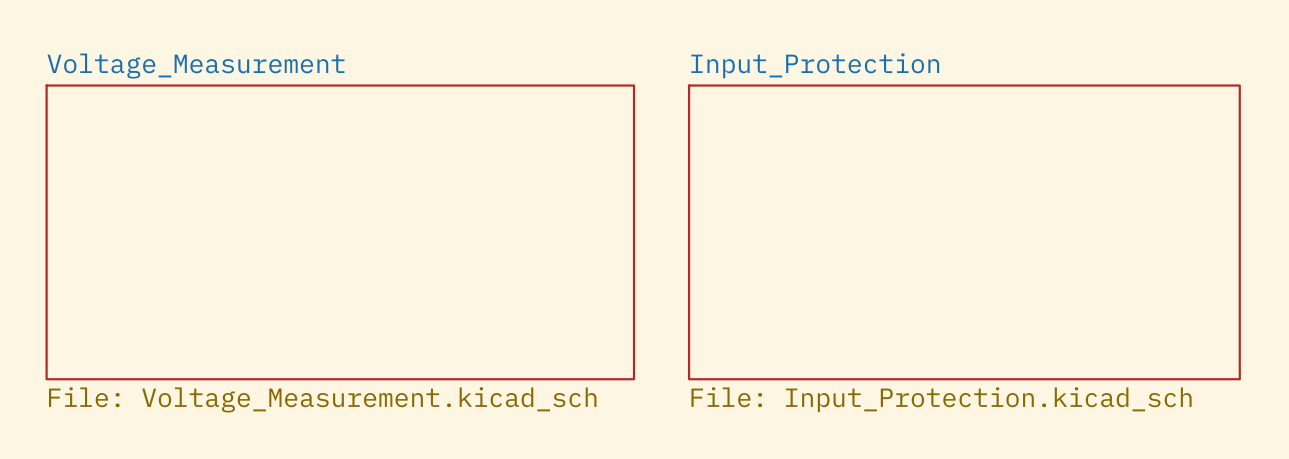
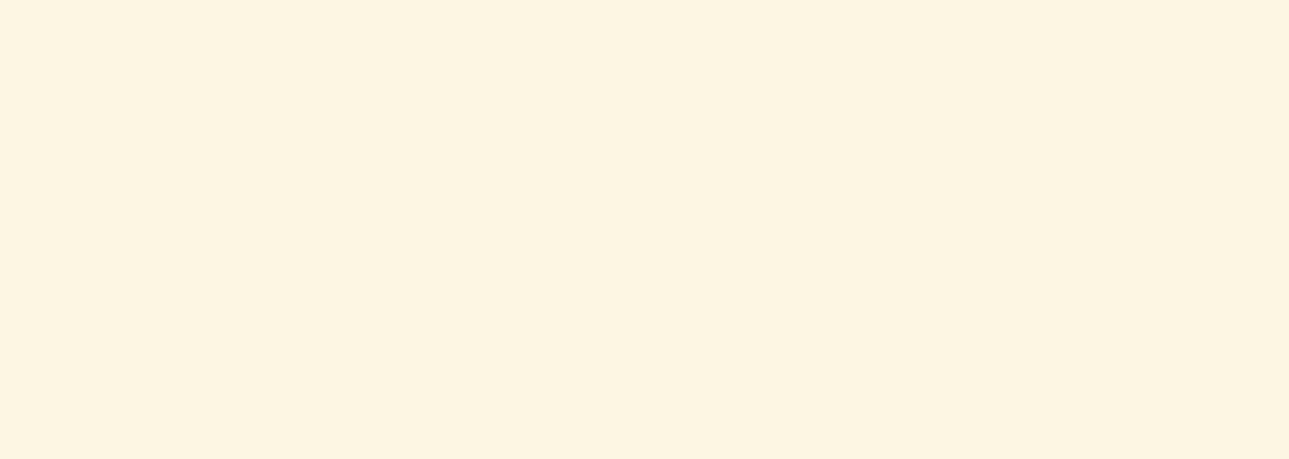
sheet Voltage_Measurement: File: Voltage_Measurement.kicad_sch (340, 232) -> none
sheet Input_Protection: File: Input_Protection.kicad_sch (964, 232) -> none

